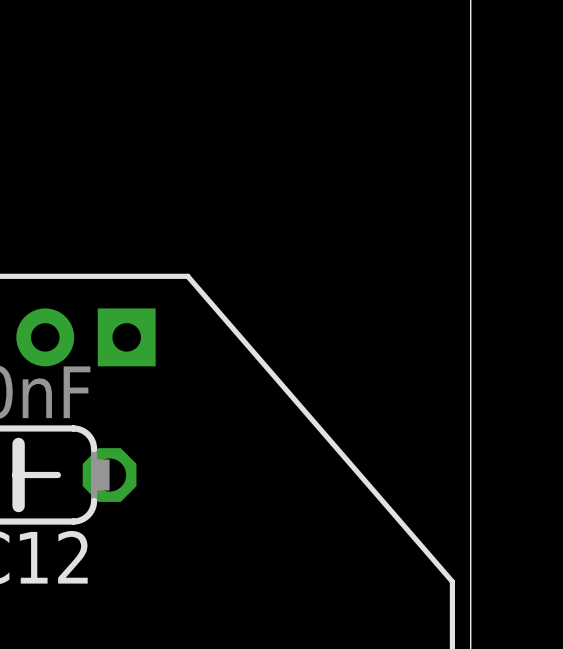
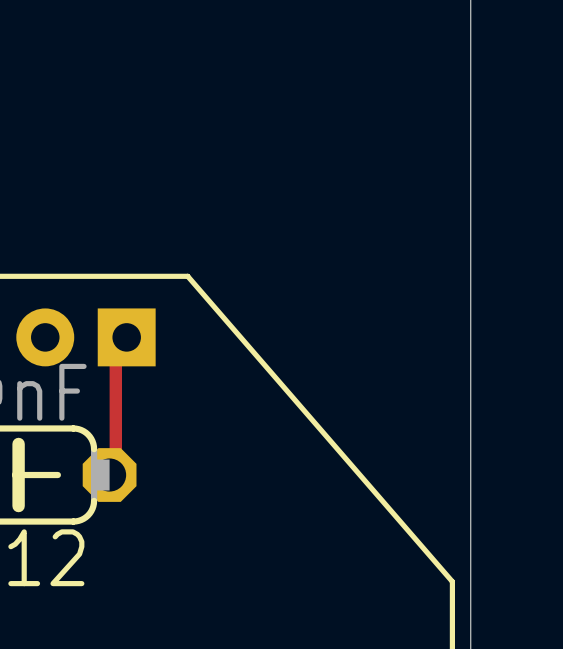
track: none -> (126, 337) (115, 348) (115, 472) (109, 475)

